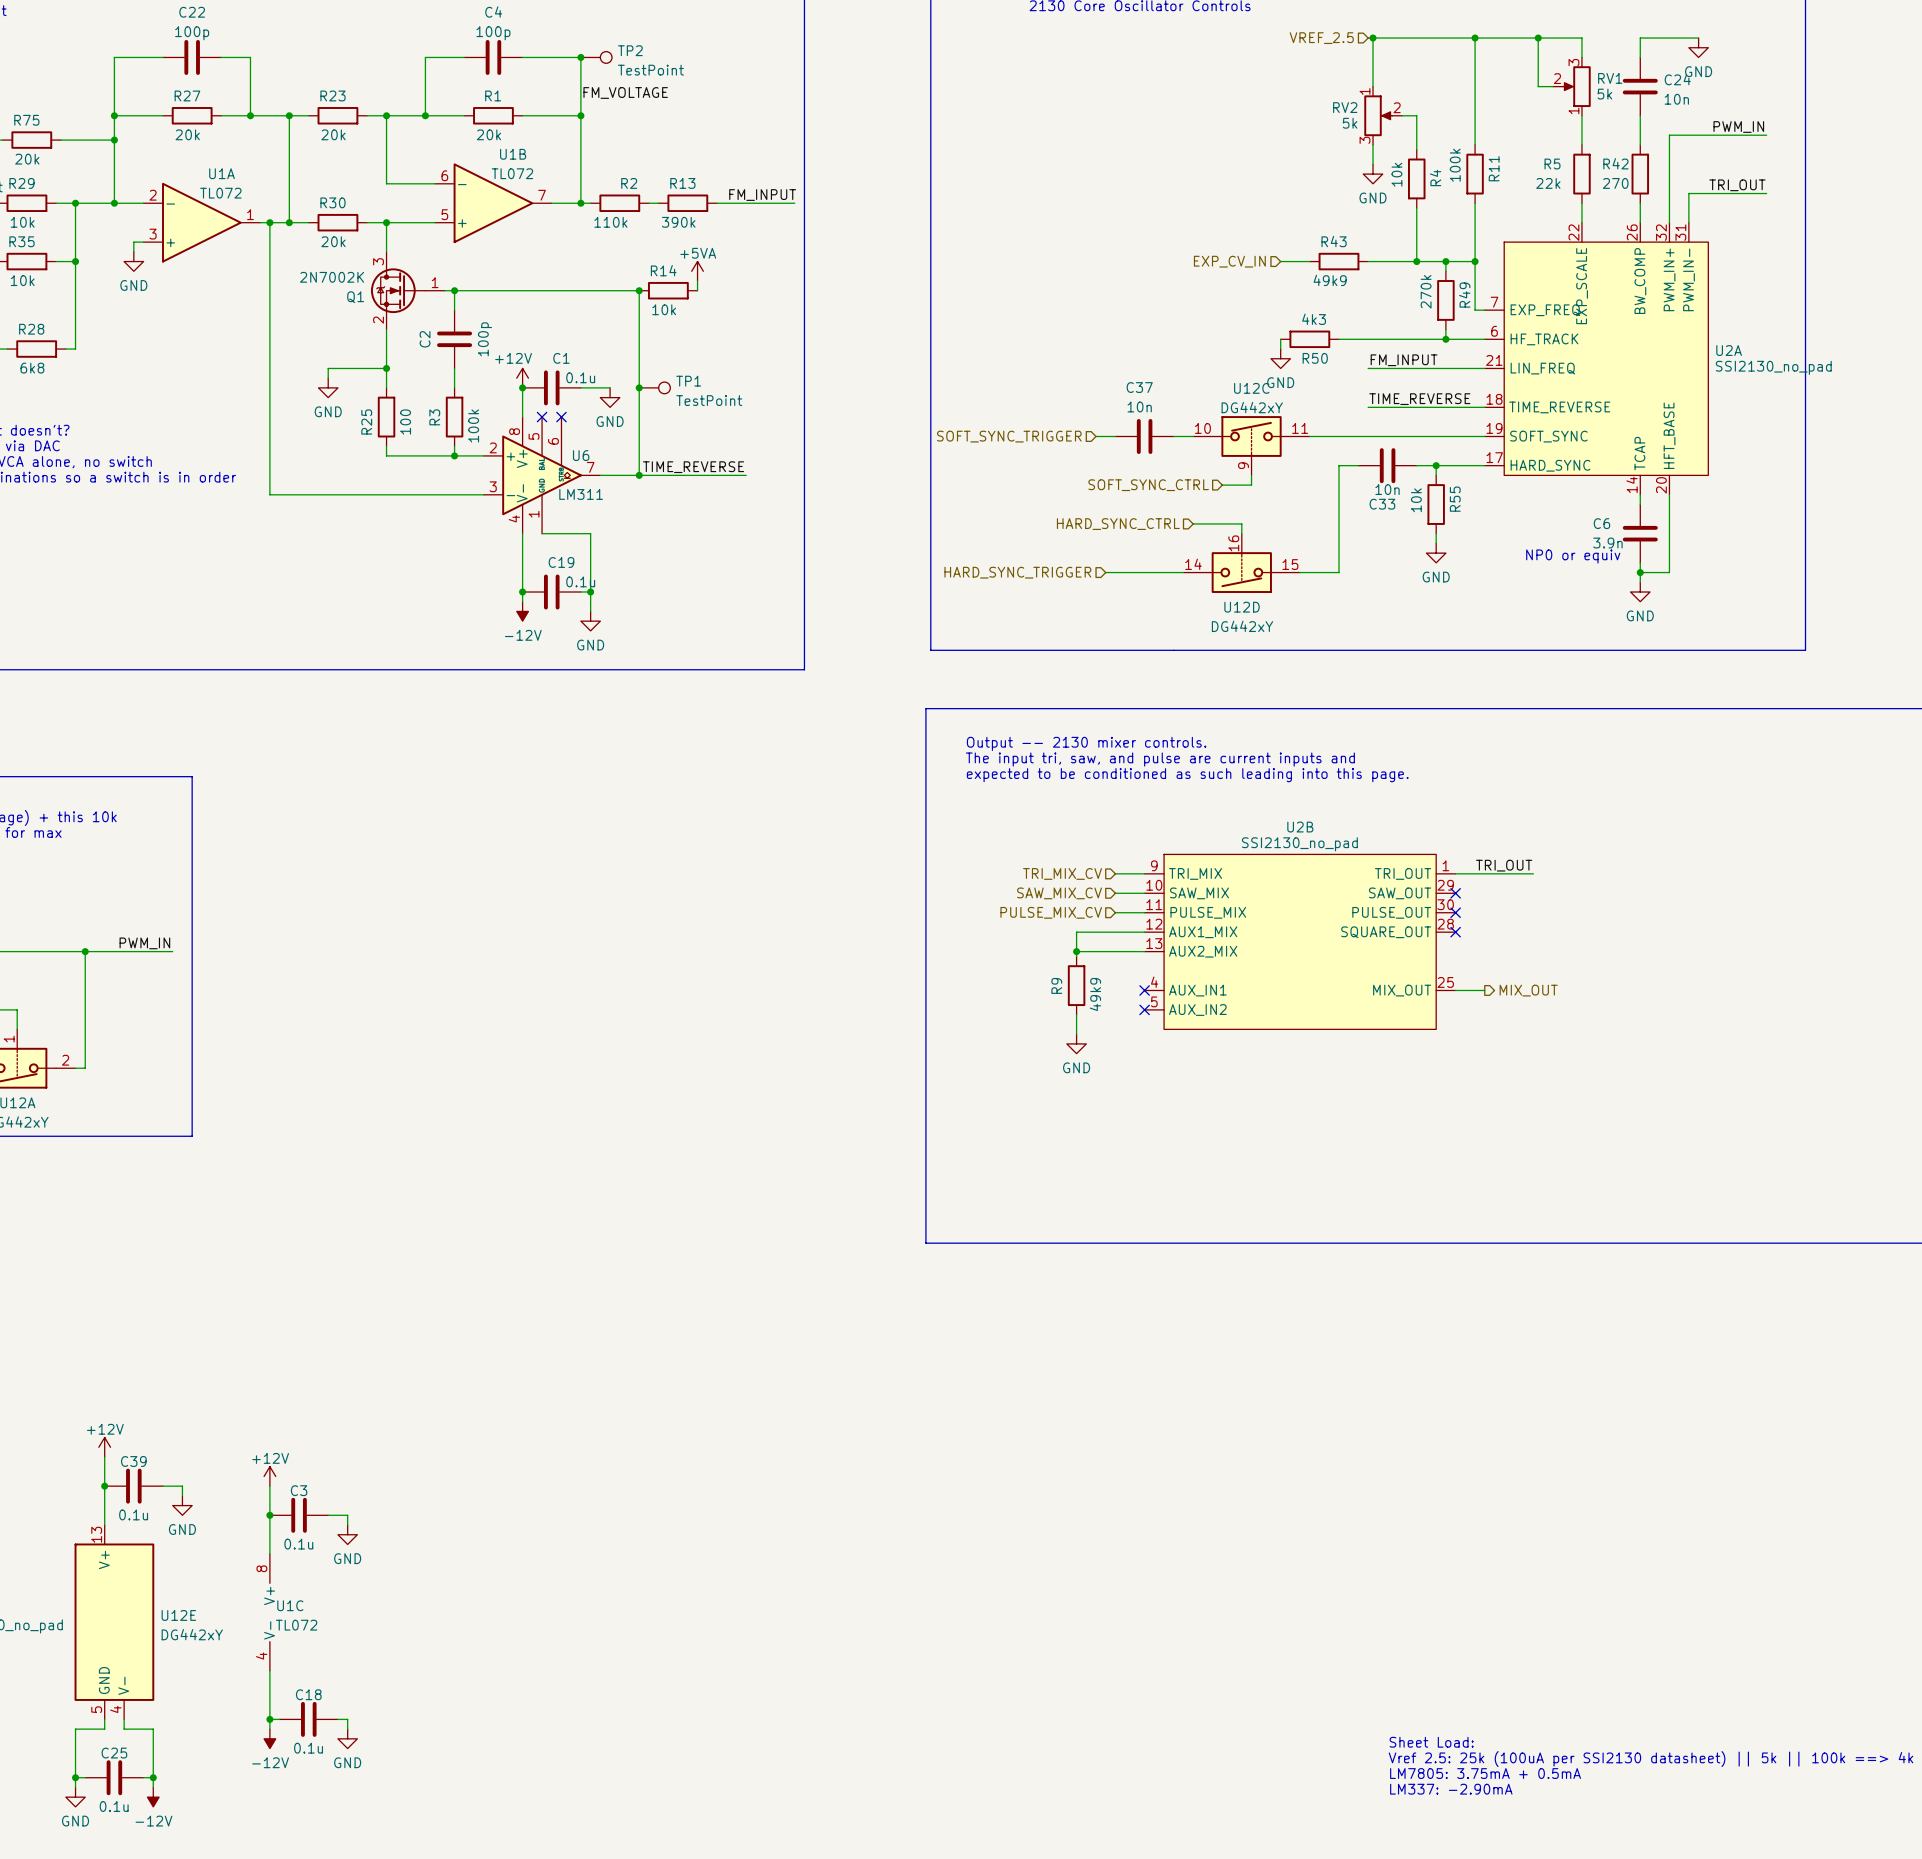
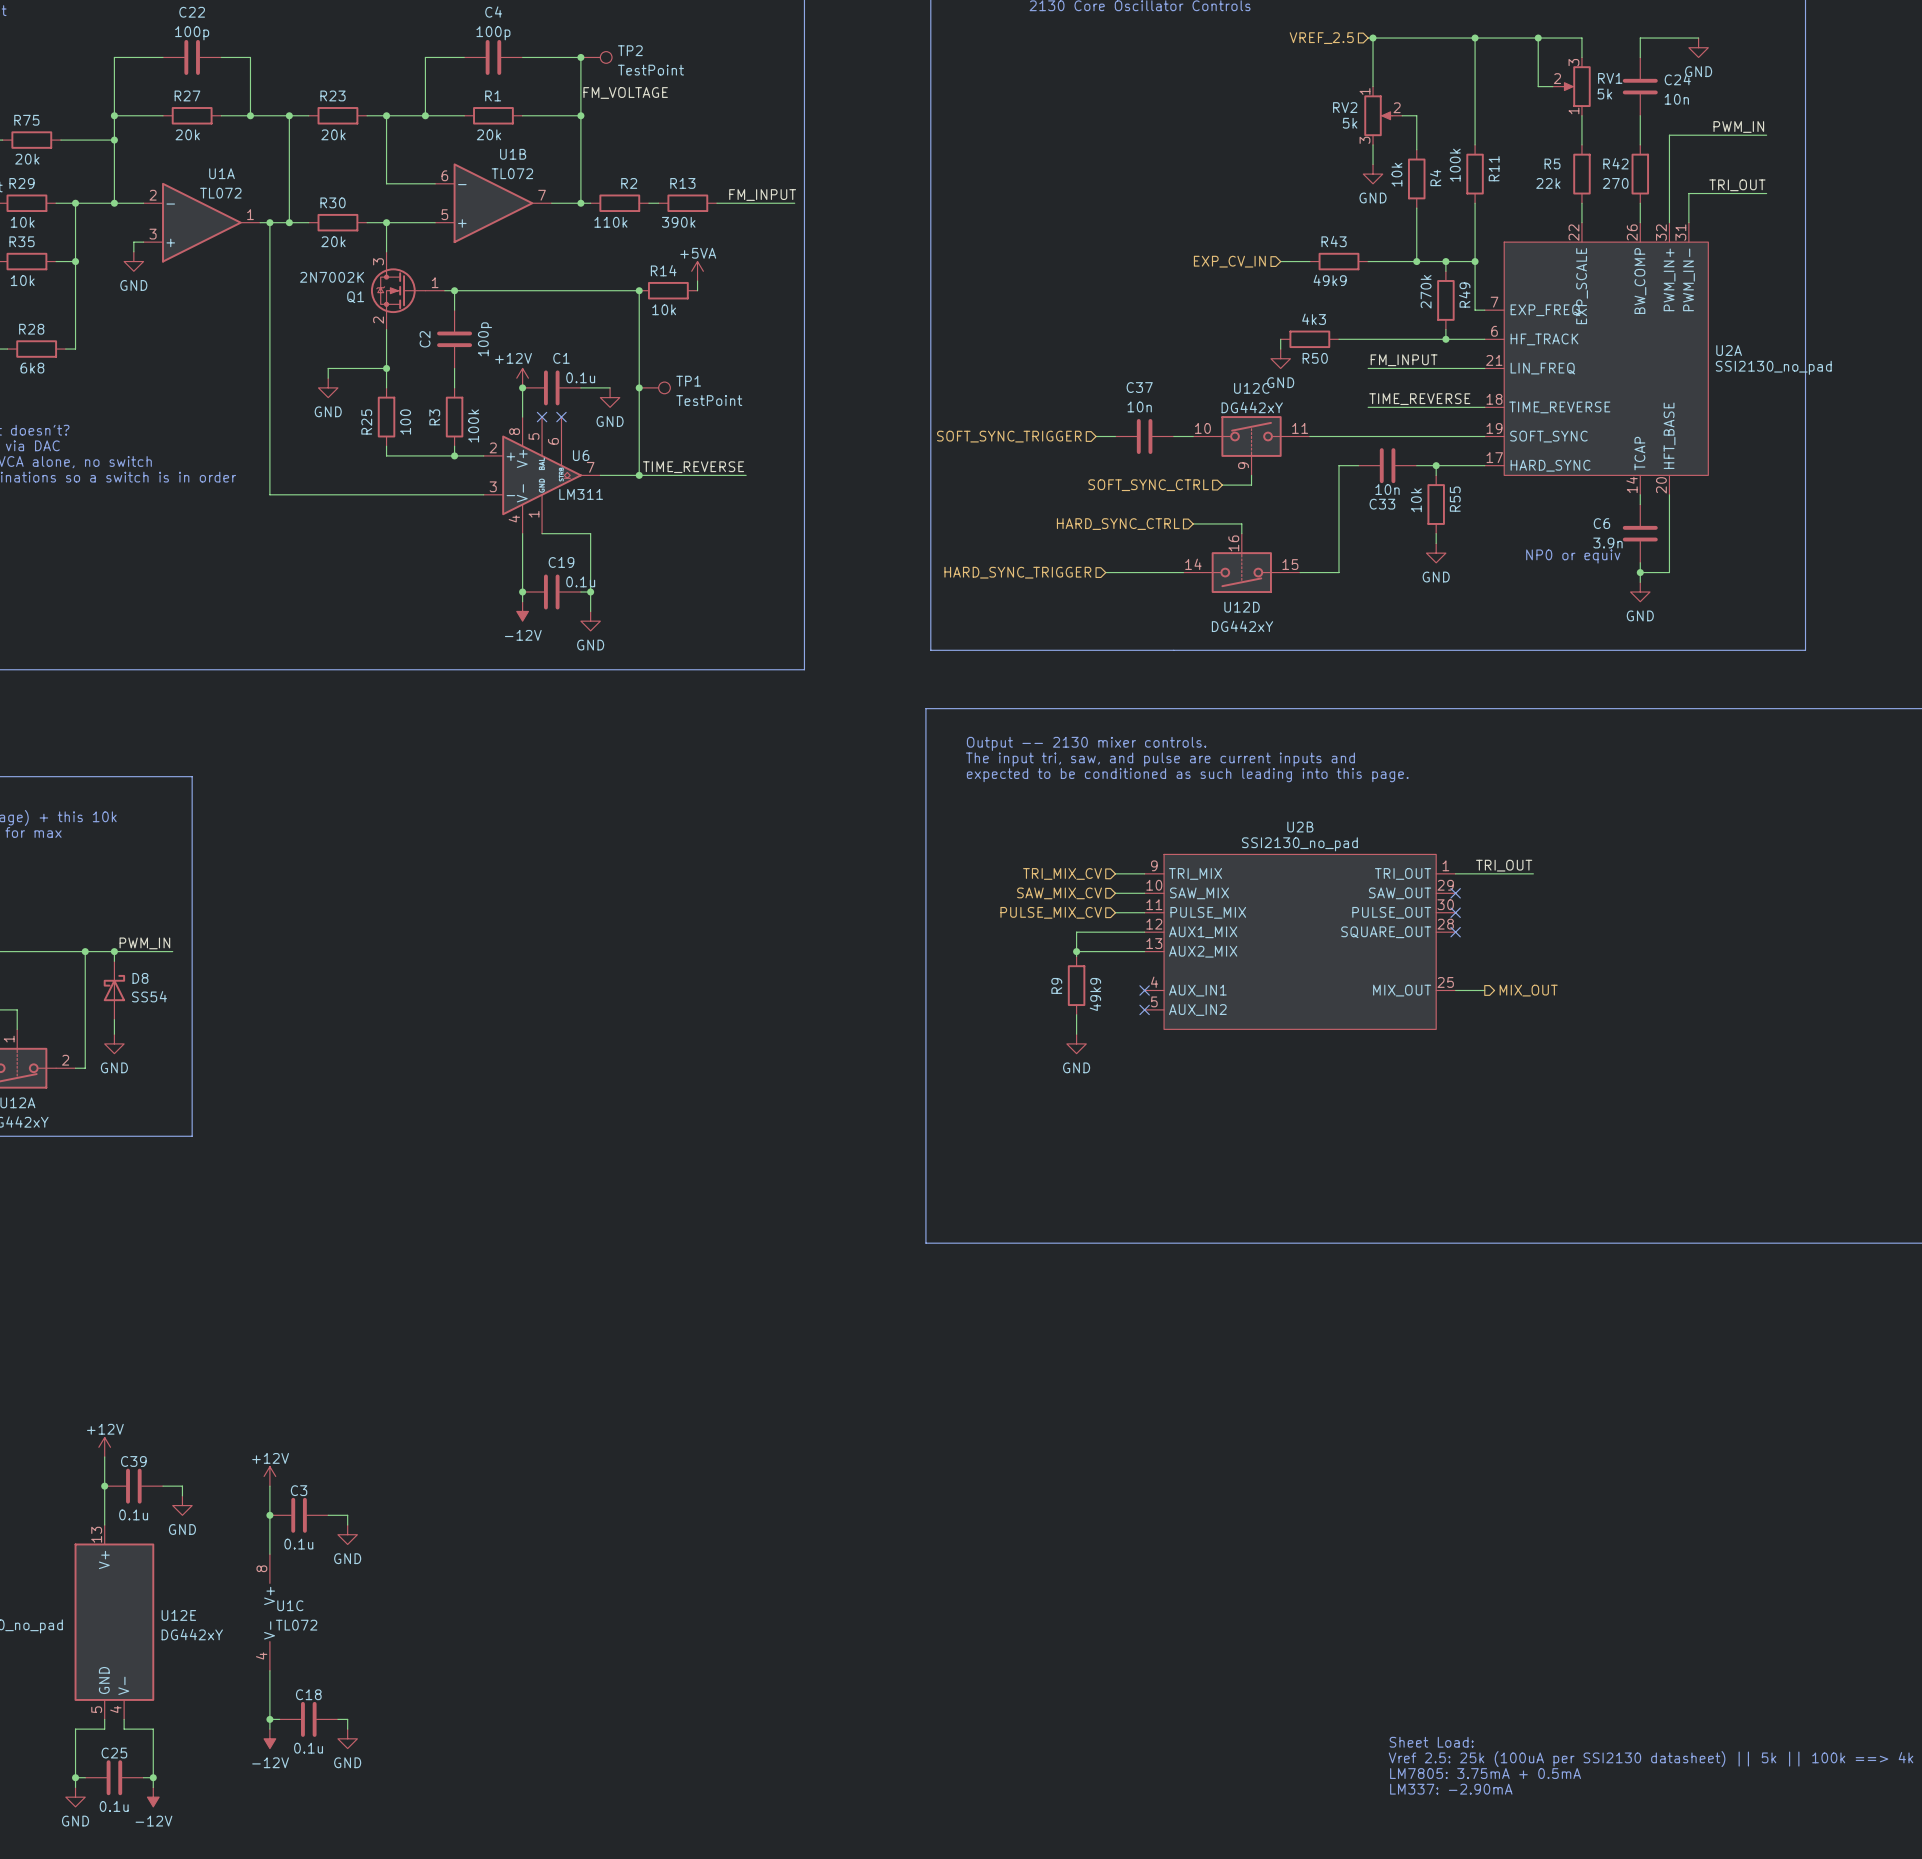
wire: none -> (114, 951) (114, 961)
junction: none -> (114, 951)
D8: none -> SS54 (114, 990)
wire: none -> (114, 1019) (114, 1034)
power symbol: none -> GND (114, 1043)

